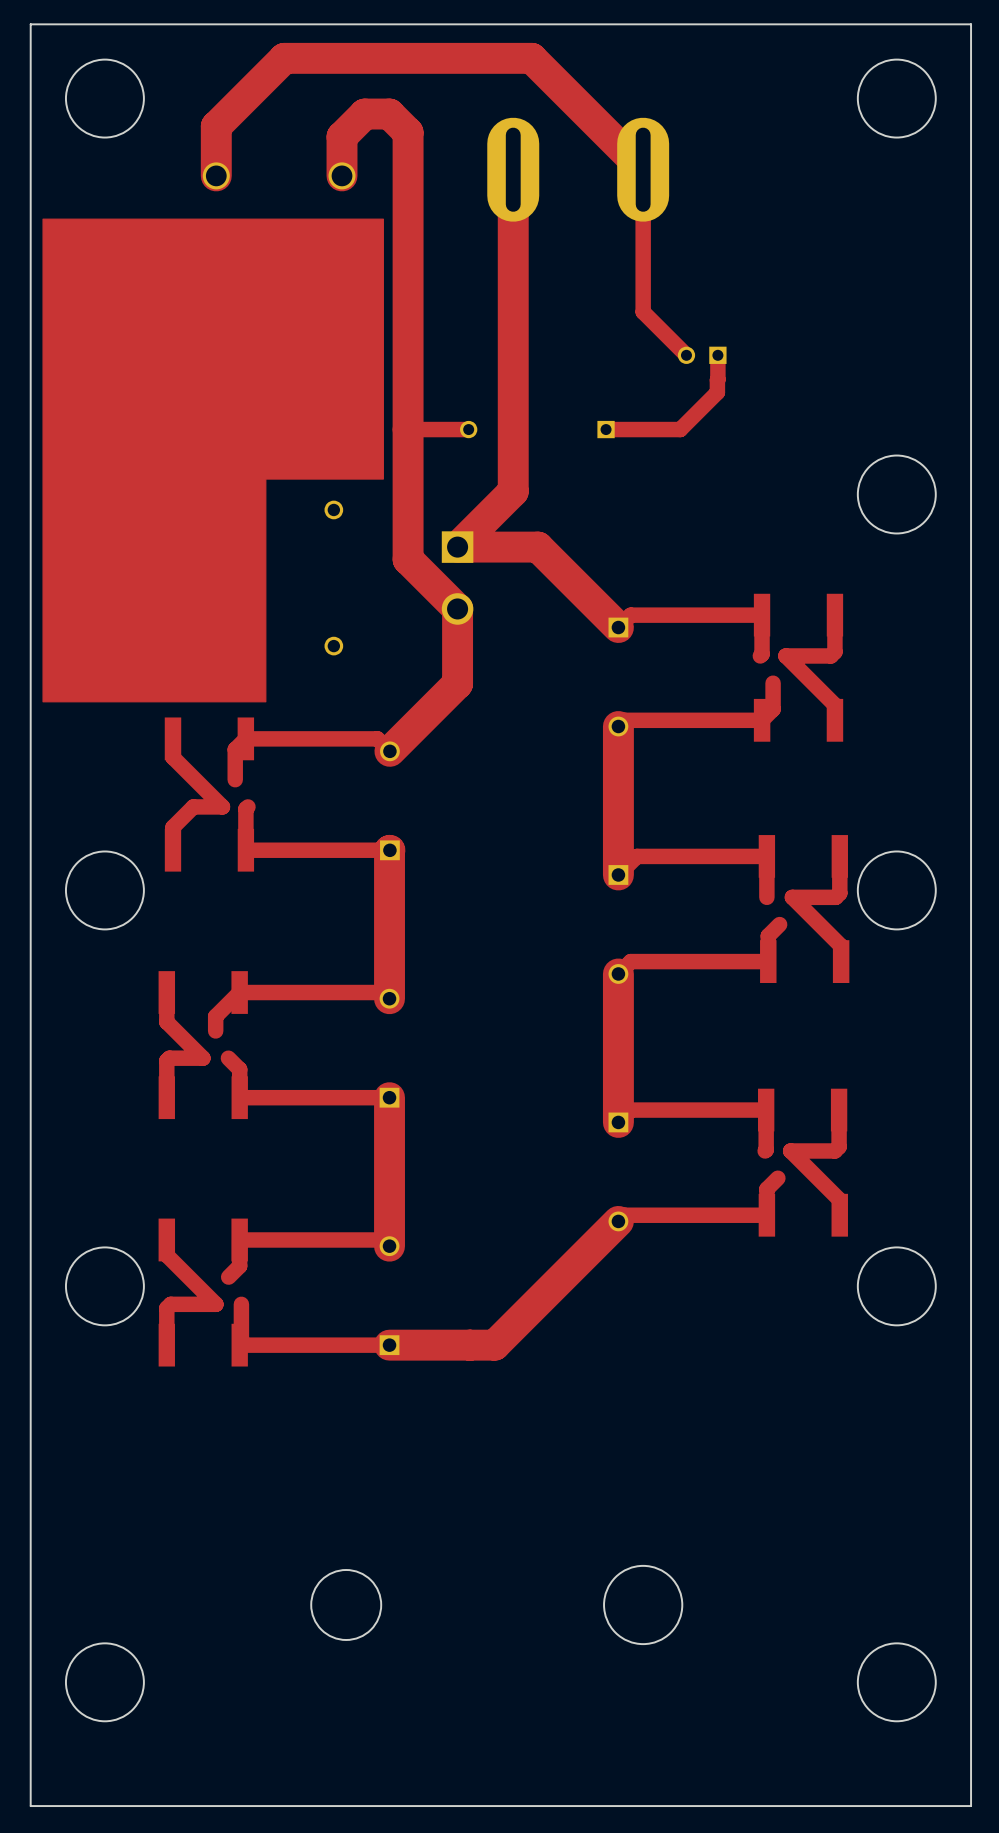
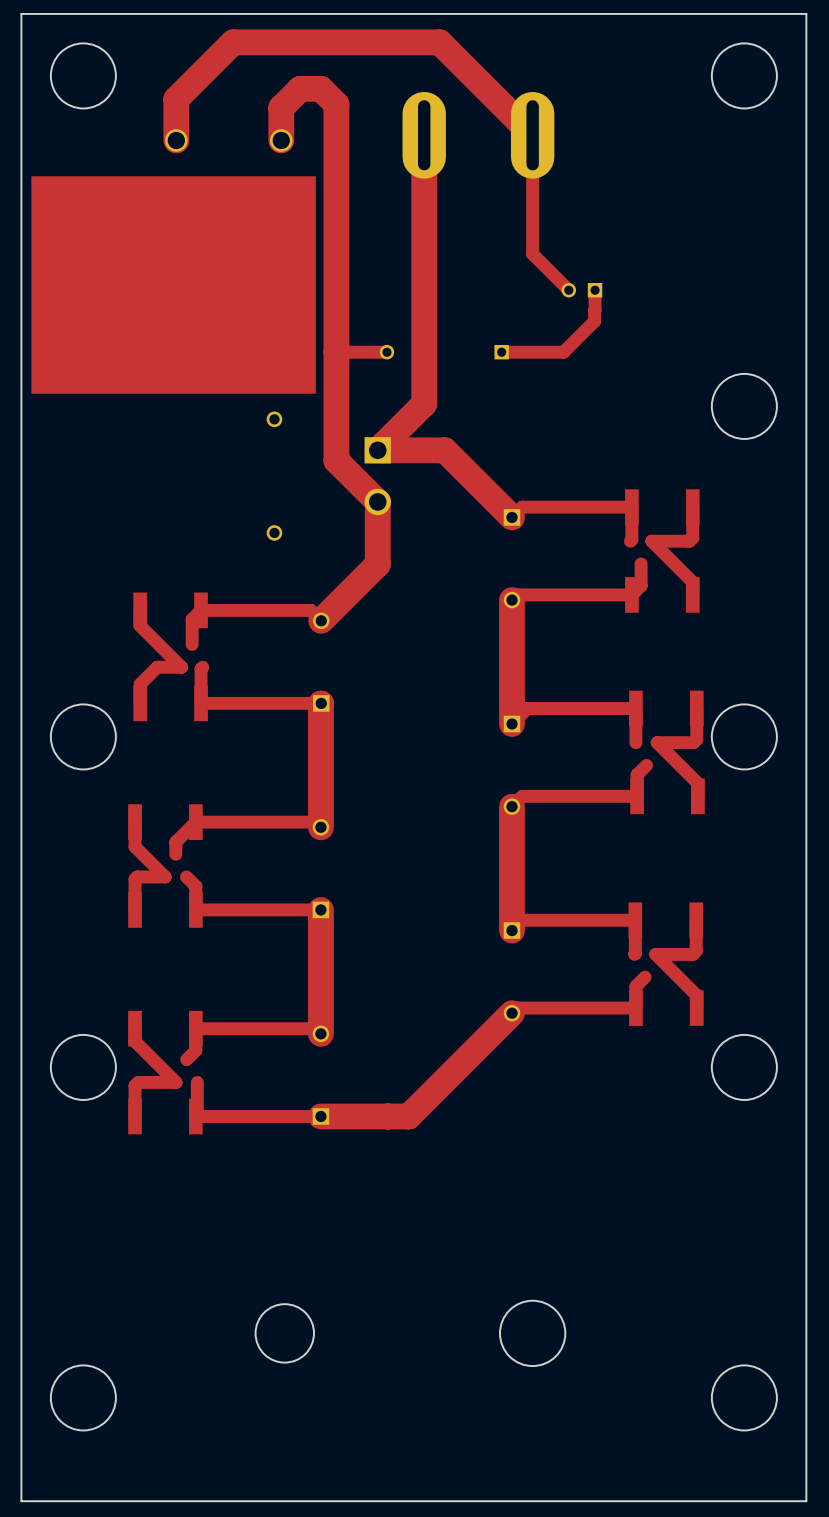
drawing: [42, 218, 384, 703] -> none
drawing: none -> [31, 176, 317, 394]

